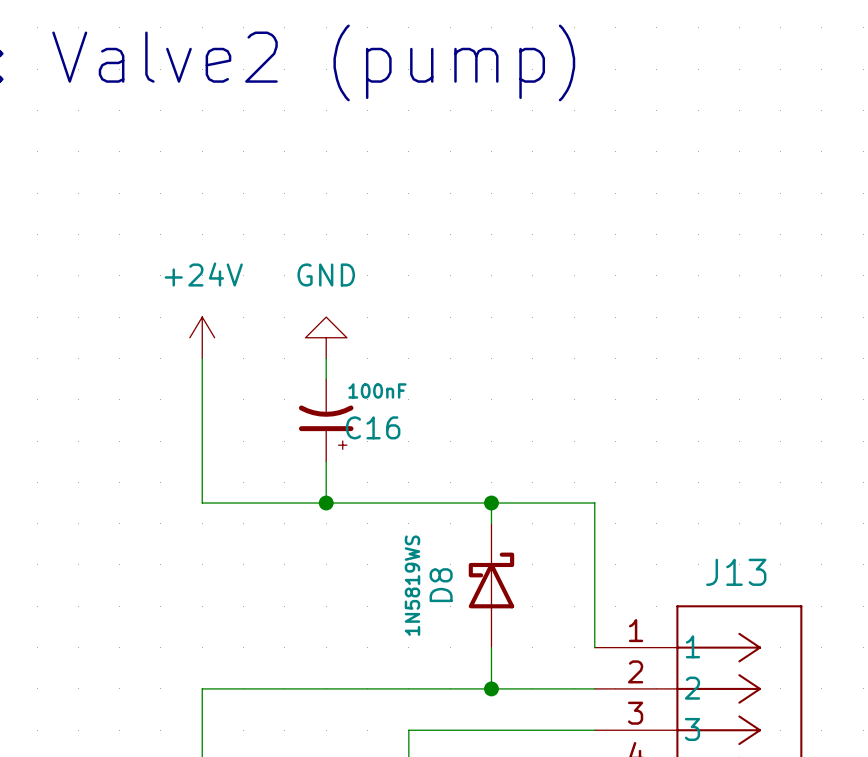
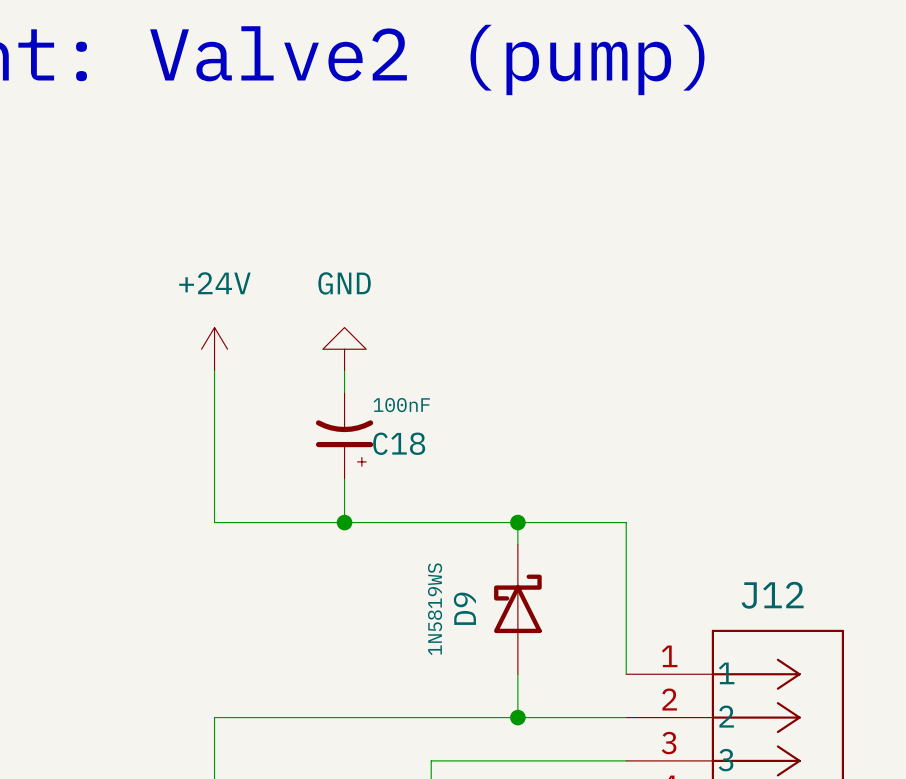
C16 name: C16 (373, 427) -> C18 (399, 443)
J13 name: J13 (736, 572) -> J12 (772, 595)
D8 name: D8 (441, 585) -> D9 (464, 608)

